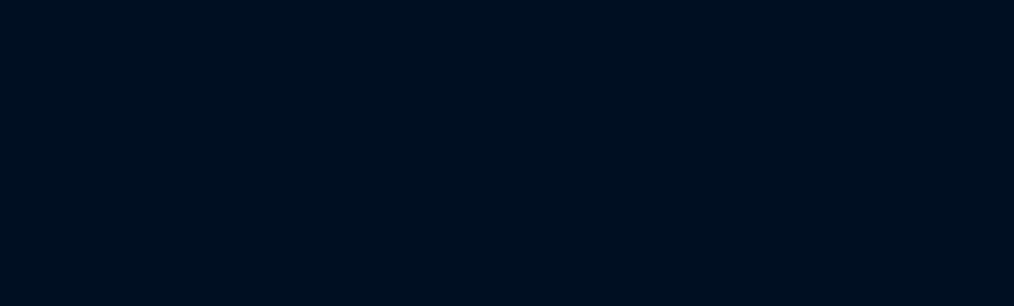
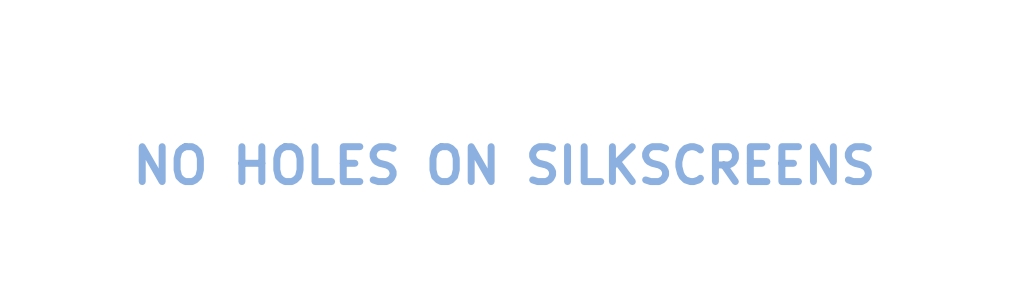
text: none -> NO HOLES ON SILKSCREENS (505, 164)

